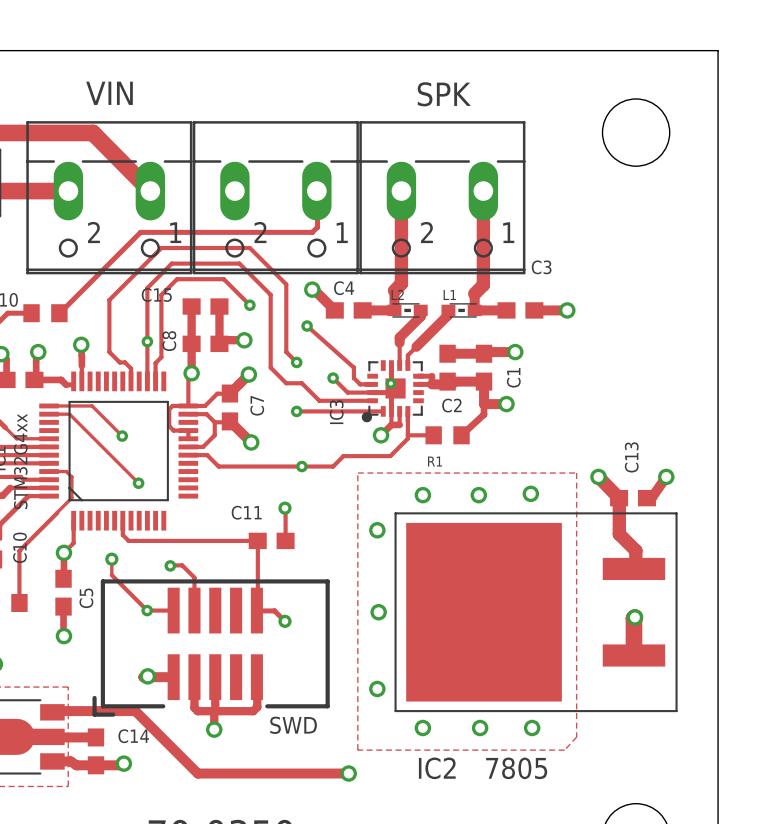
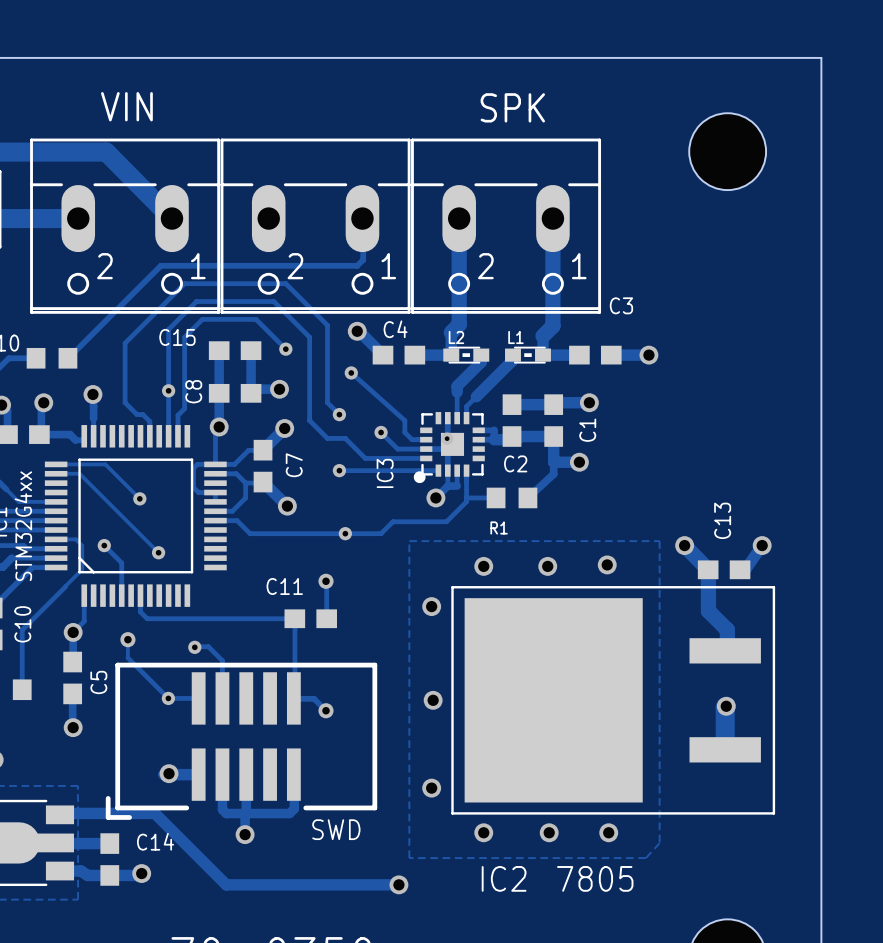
track: none -> (104, 545) (121, 563) (121, 595)
via: none -> (104, 545)

